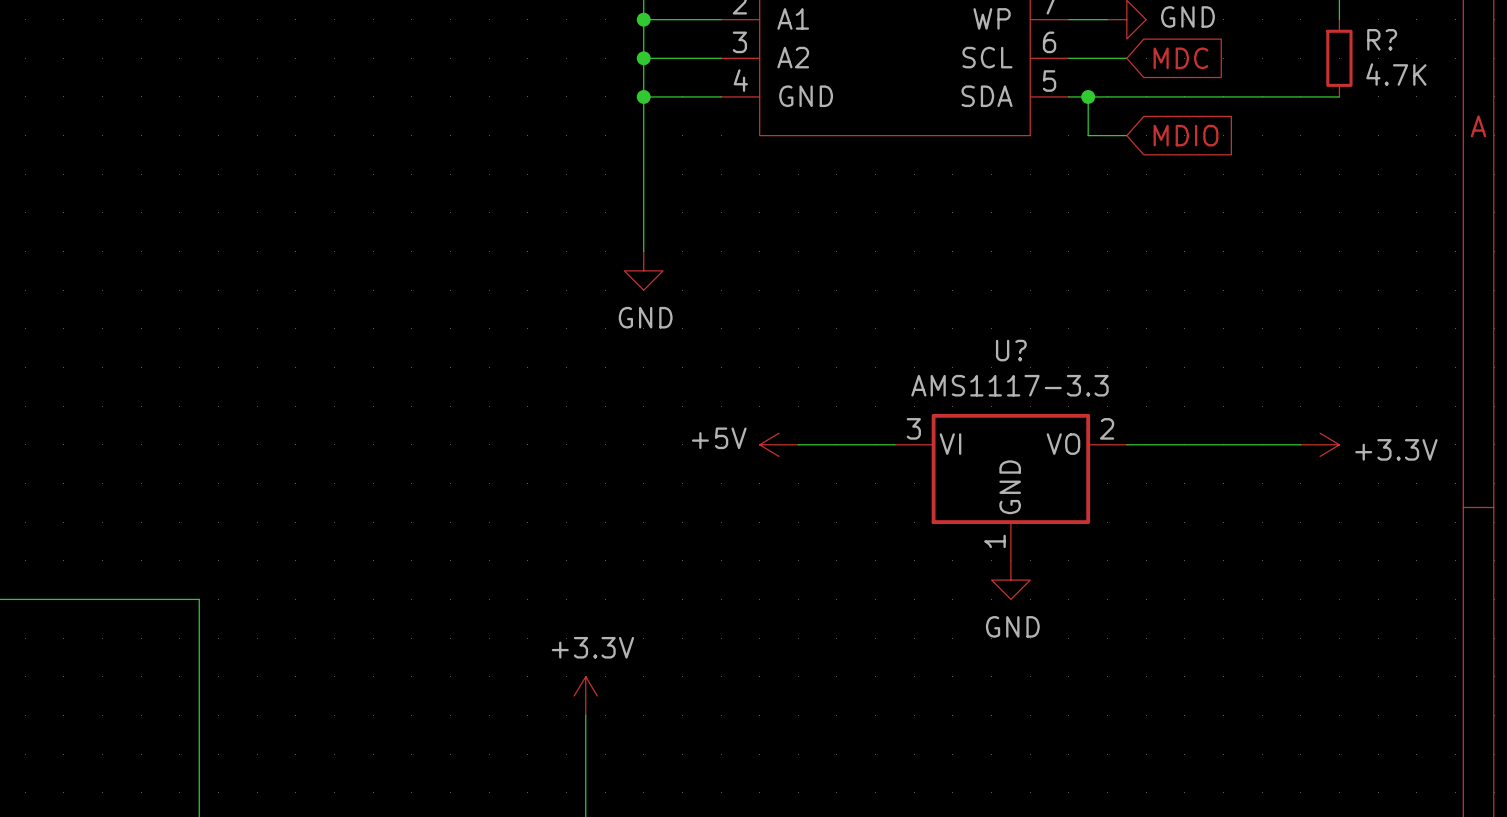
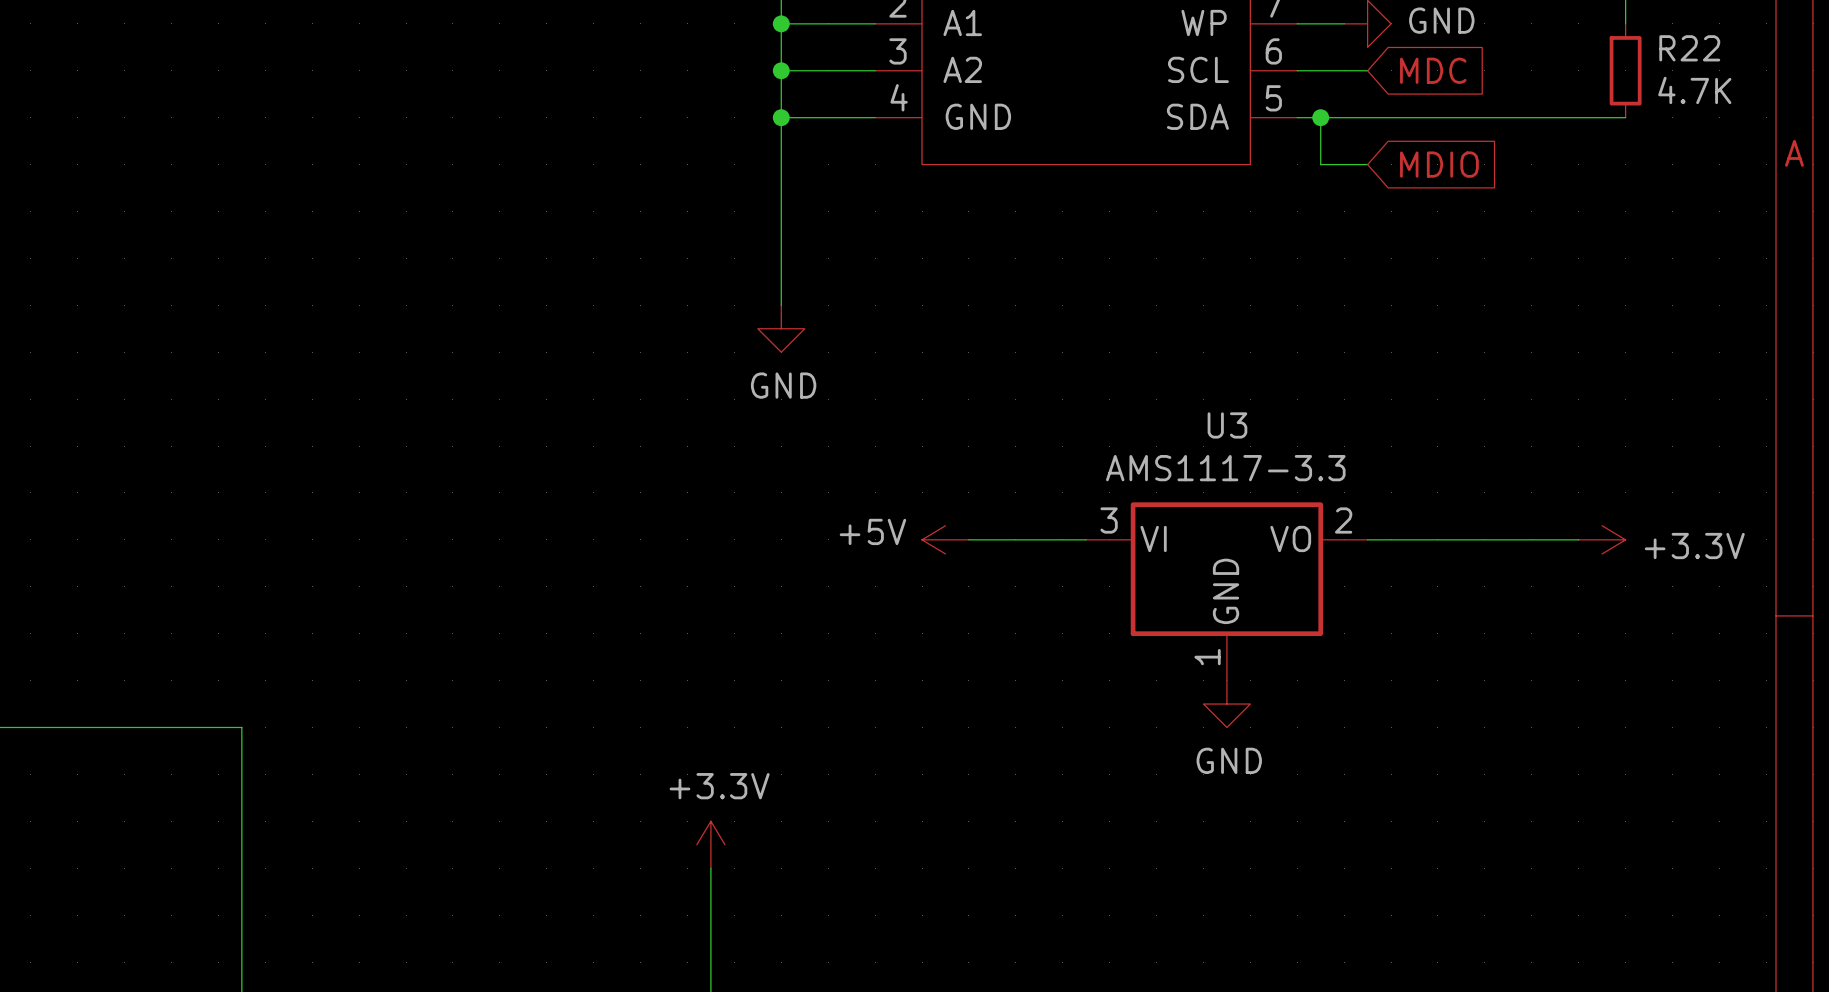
R? name: R? (1382, 39) -> R22 (1689, 48)
U? name: U? (1011, 350) -> U3 (1227, 425)

